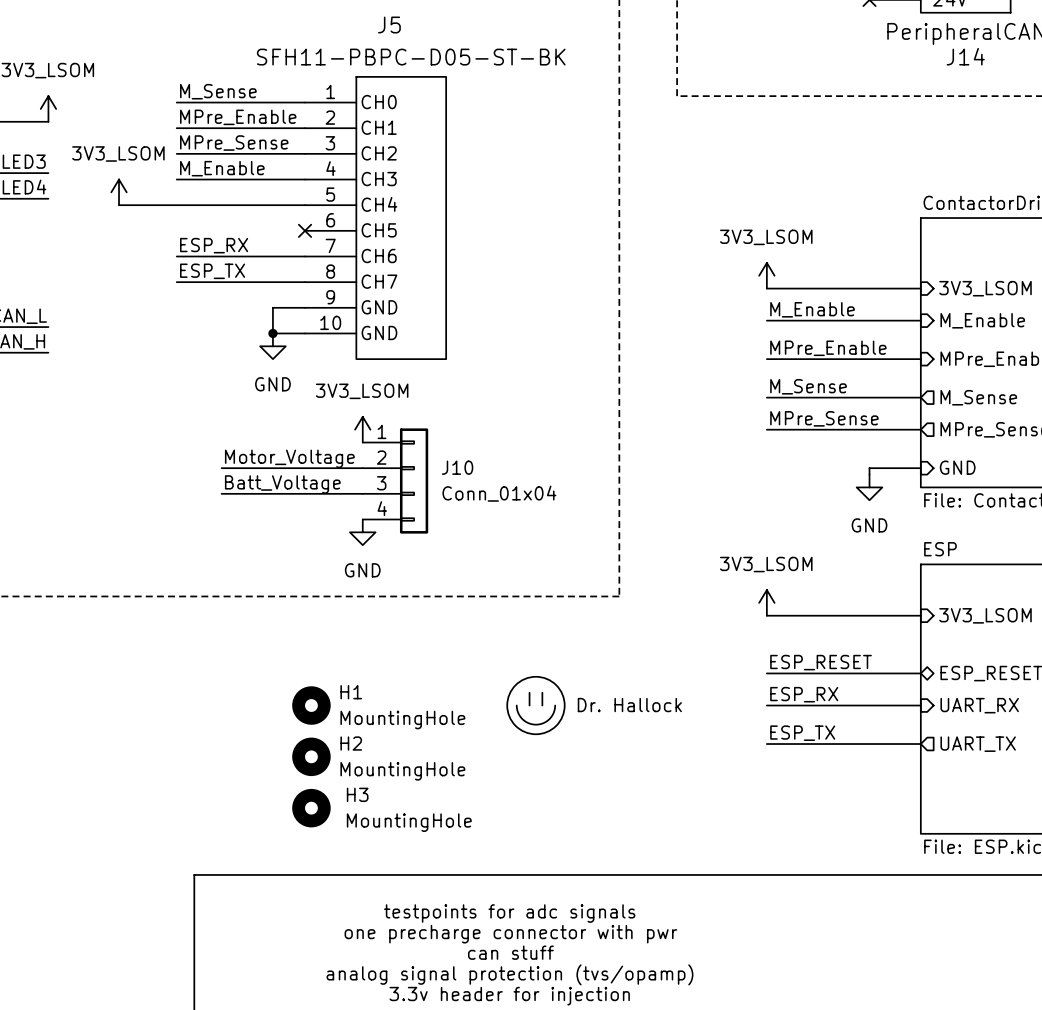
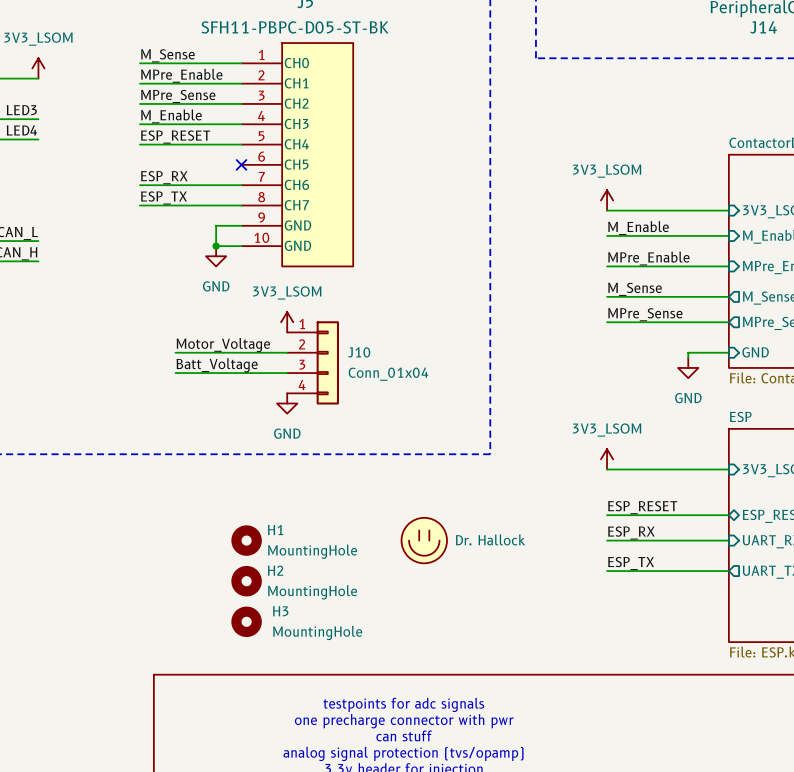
power symbol: 3V3_LSOM (119, 192) -> none
label: none -> ESP_RESET (175, 137)
wire: (119, 205) (176, 205) -> none

